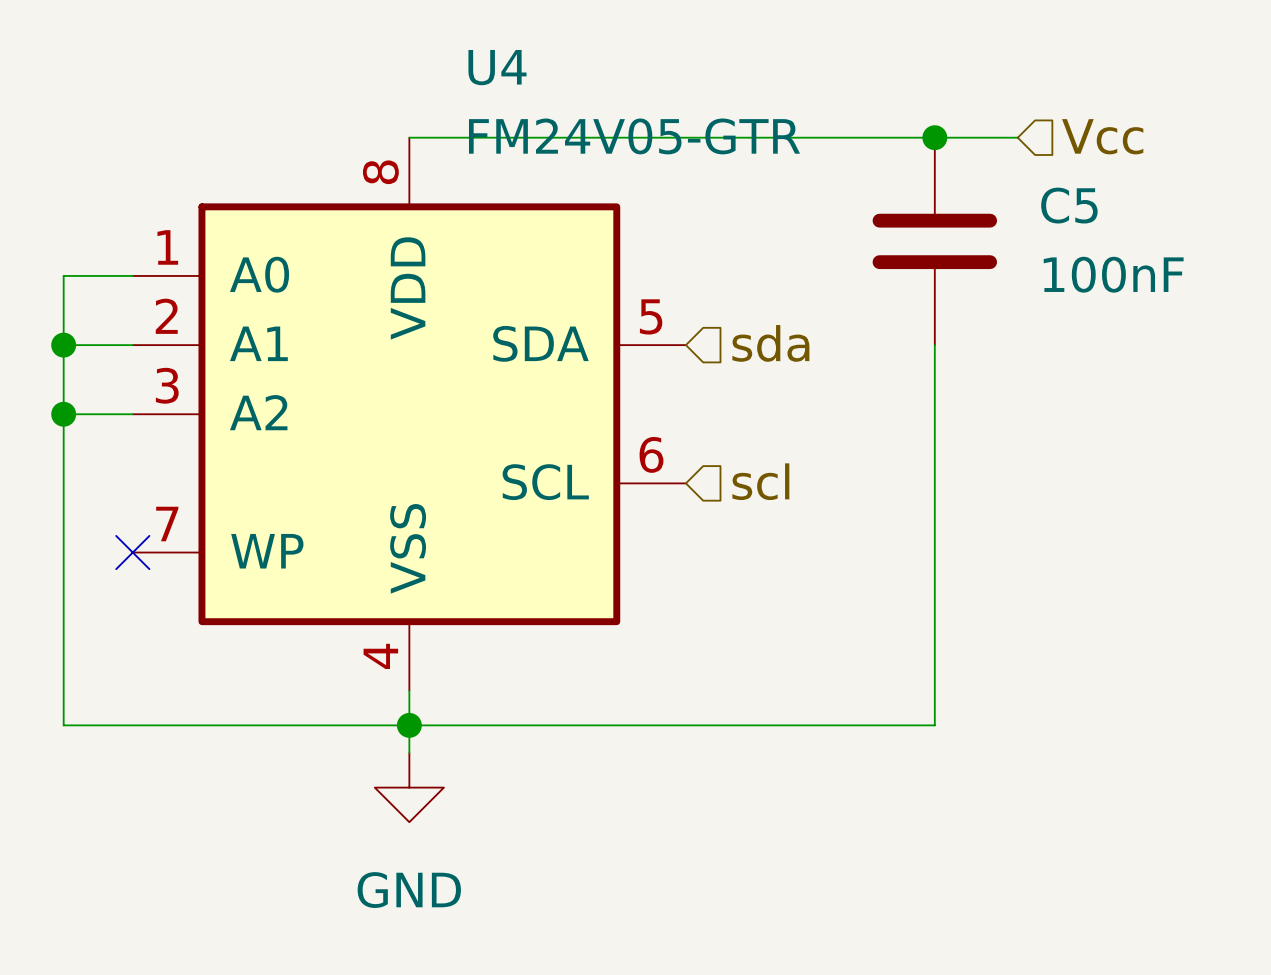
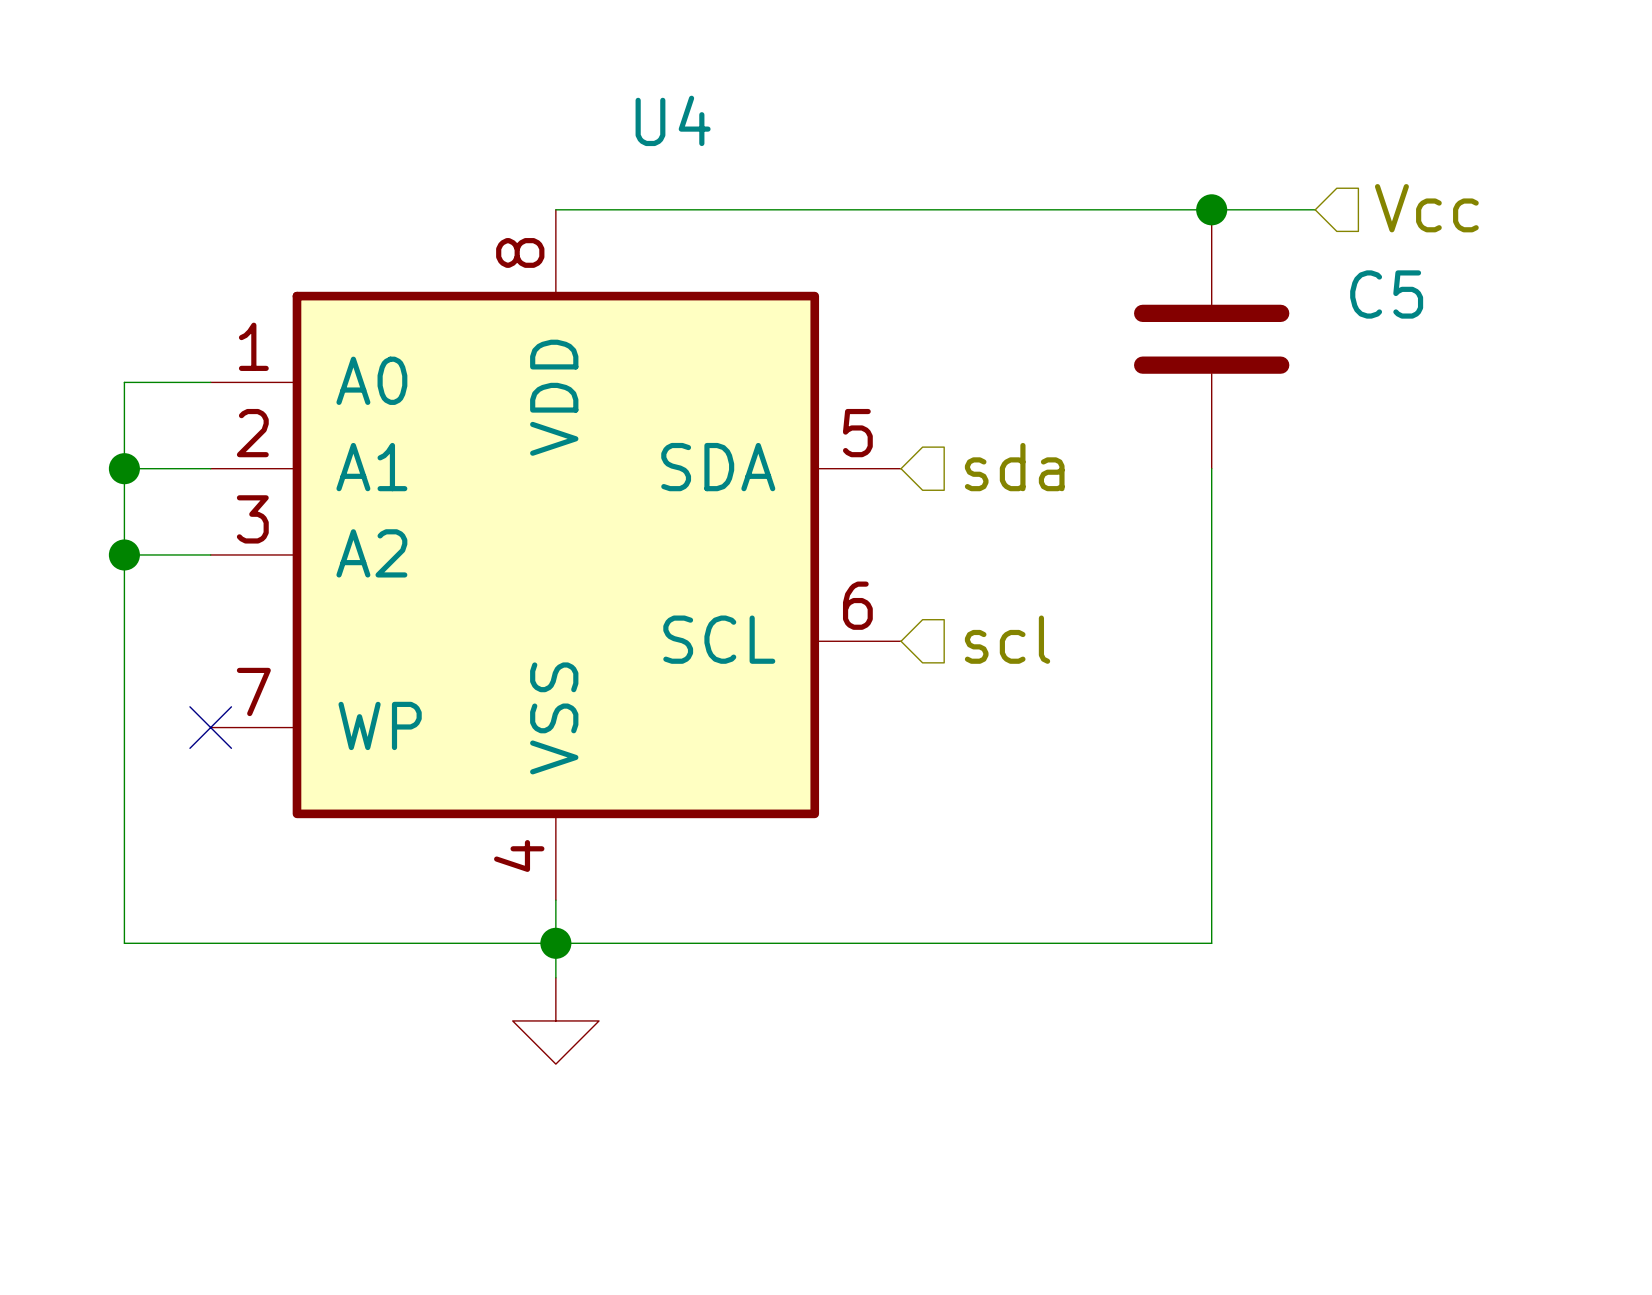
U4 value: FM24V05-GTR (634, 136) -> none
C5 value: 100nF (1113, 274) -> none
power symbol text: GND (409, 890) -> none

